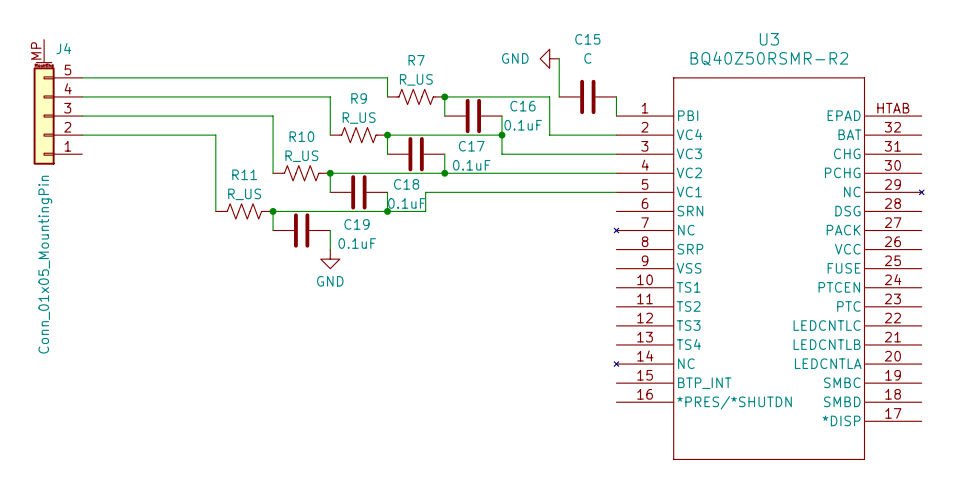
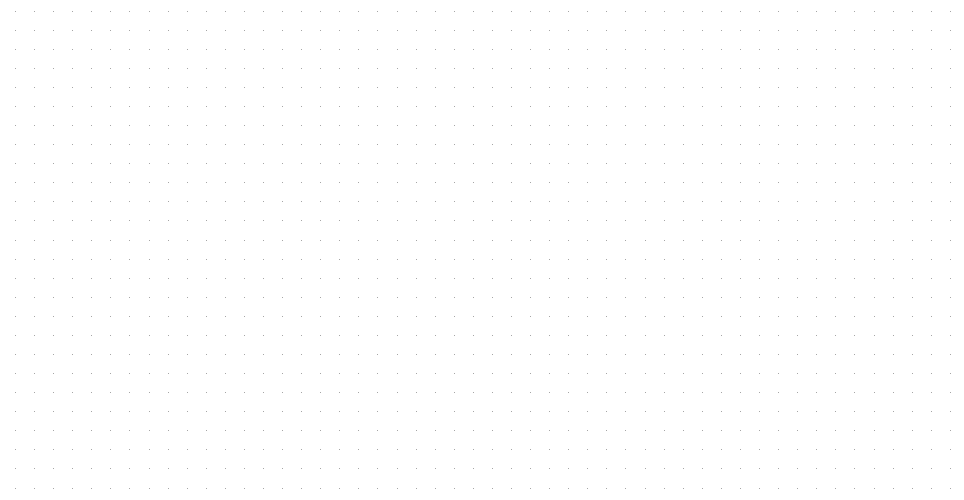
power symbol: GND (549, 58) -> none
wire: (559, 58) (559, 96) -> none
wire: (82, 77) (387, 77) (387, 96) -> none
wire: (82, 96) (330, 96) (330, 135) -> none
R7: R_US (416, 96) -> none
junction: (444, 96) -> none
C15: C (587, 96) -> none
wire: (616, 96) (616, 116) -> none
J4: Conn_01x05_MountingPin (57, 102) -> none
wire: (82, 116) (273, 116) (273, 173) -> none
wire: (444, 116) (444, 96) (549, 96) (549, 135) (616, 135) -> none
C16: 0.1uF (473, 116) -> none
wire: (501, 116) (501, 154) (616, 154) -> none
wire: (82, 135) (215, 135) (215, 211) -> none
R9: R_US (358, 135) -> none
junction: (387, 135) -> none
wire: (501, 135) (387, 135) (387, 154) -> none
junction: (501, 135) -> none
C17: 0.1uF (416, 154) -> none
wire: (444, 154) (444, 173) -> none
R10: R_US (301, 173) -> none
junction: (330, 173) -> none
junction: (444, 173) -> none
wire: (616, 173) (330, 173) (330, 192) -> none
C18: 0.1uF (358, 192) -> none
wire: (387, 192) (387, 211) -> none
wire: (616, 192) (425, 192) (425, 211) (273, 211) (273, 230) -> none
R11: R_US (244, 211) -> none
junction: (273, 211) -> none
junction: (387, 211) -> none
C19: 0.1uF (301, 230) -> none
wire: (330, 230) (330, 249) -> none
power symbol: GND (330, 259) -> none
U3: BQ40Z50RSMR-R2 (769, 268) -> none

